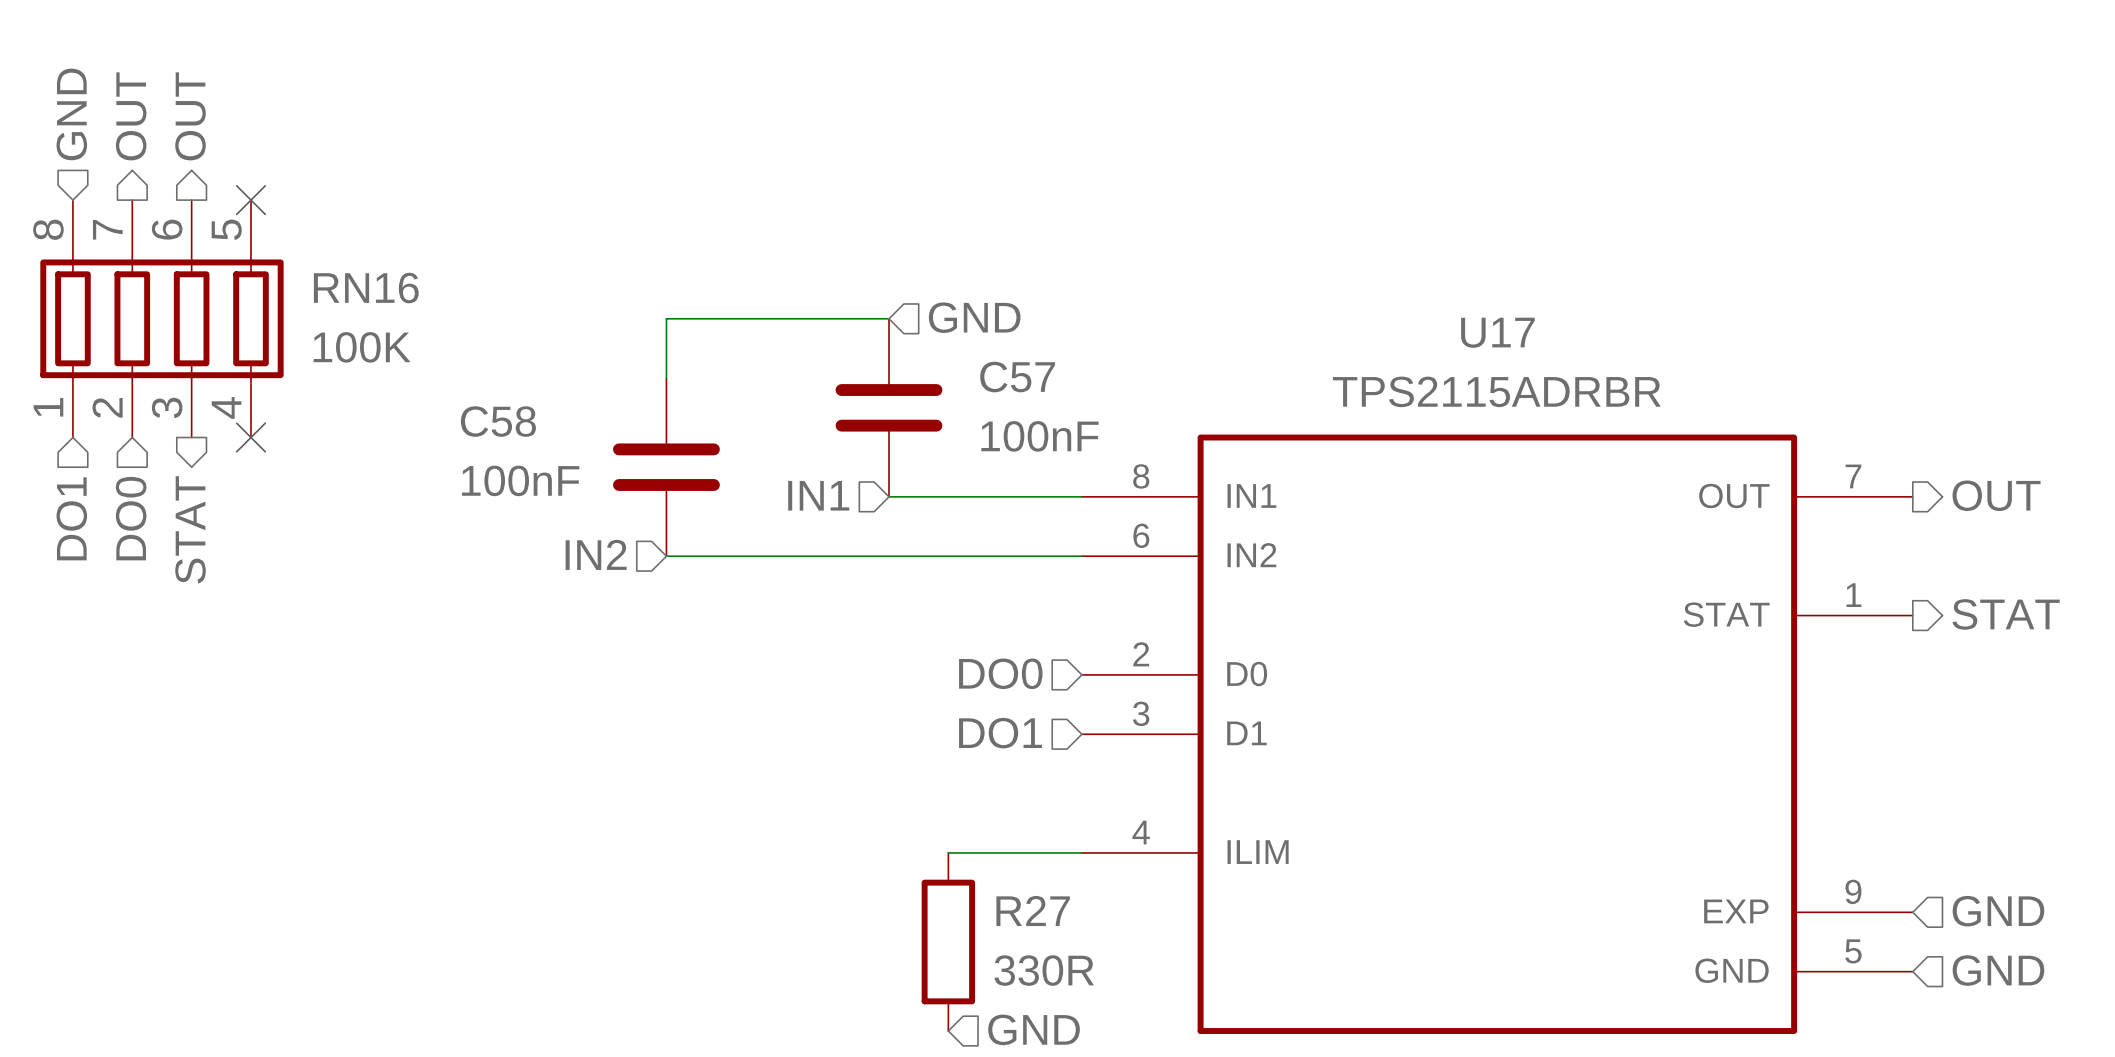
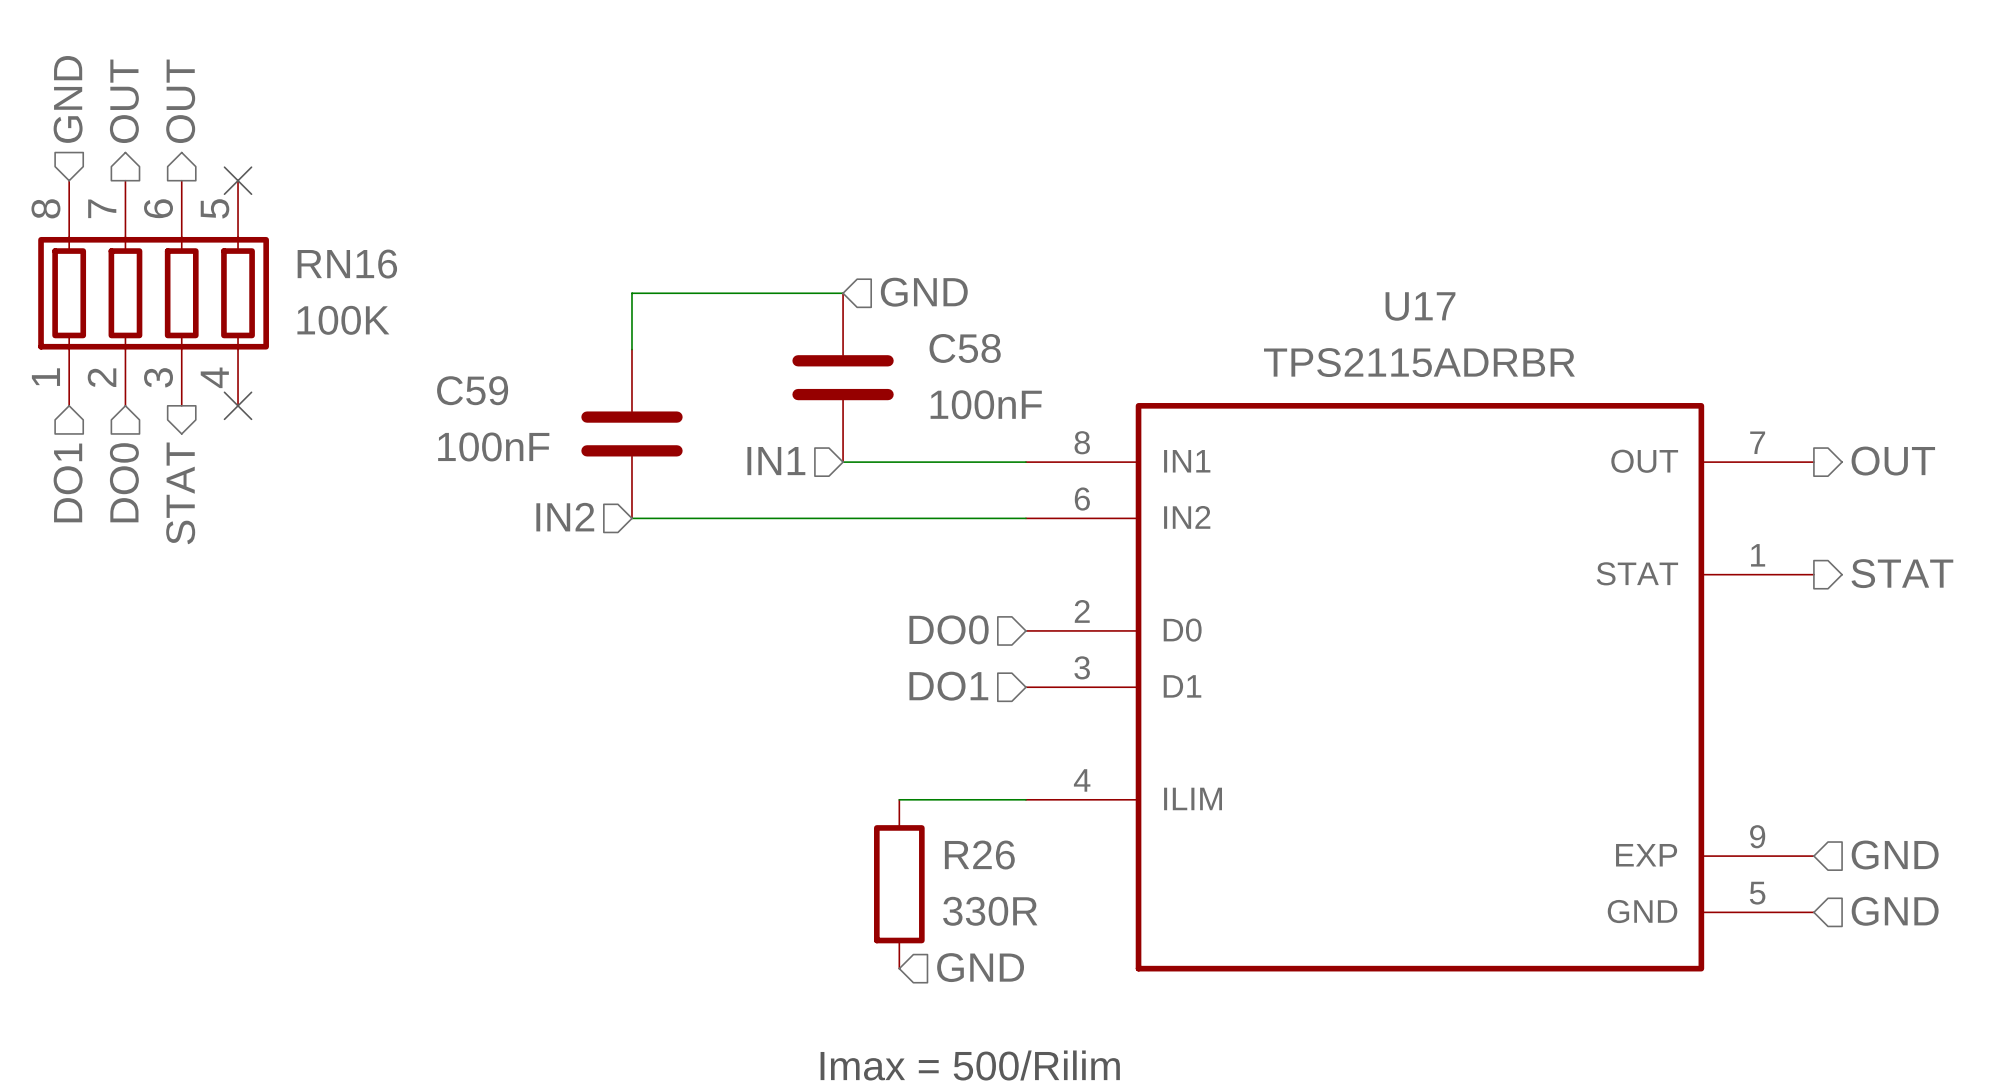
C57 name: C57 (1017, 377) -> C58 (965, 348)
C58 name: C58 (498, 421) -> C59 (472, 390)
R27 name: R27 (1033, 910) -> R26 (979, 855)

